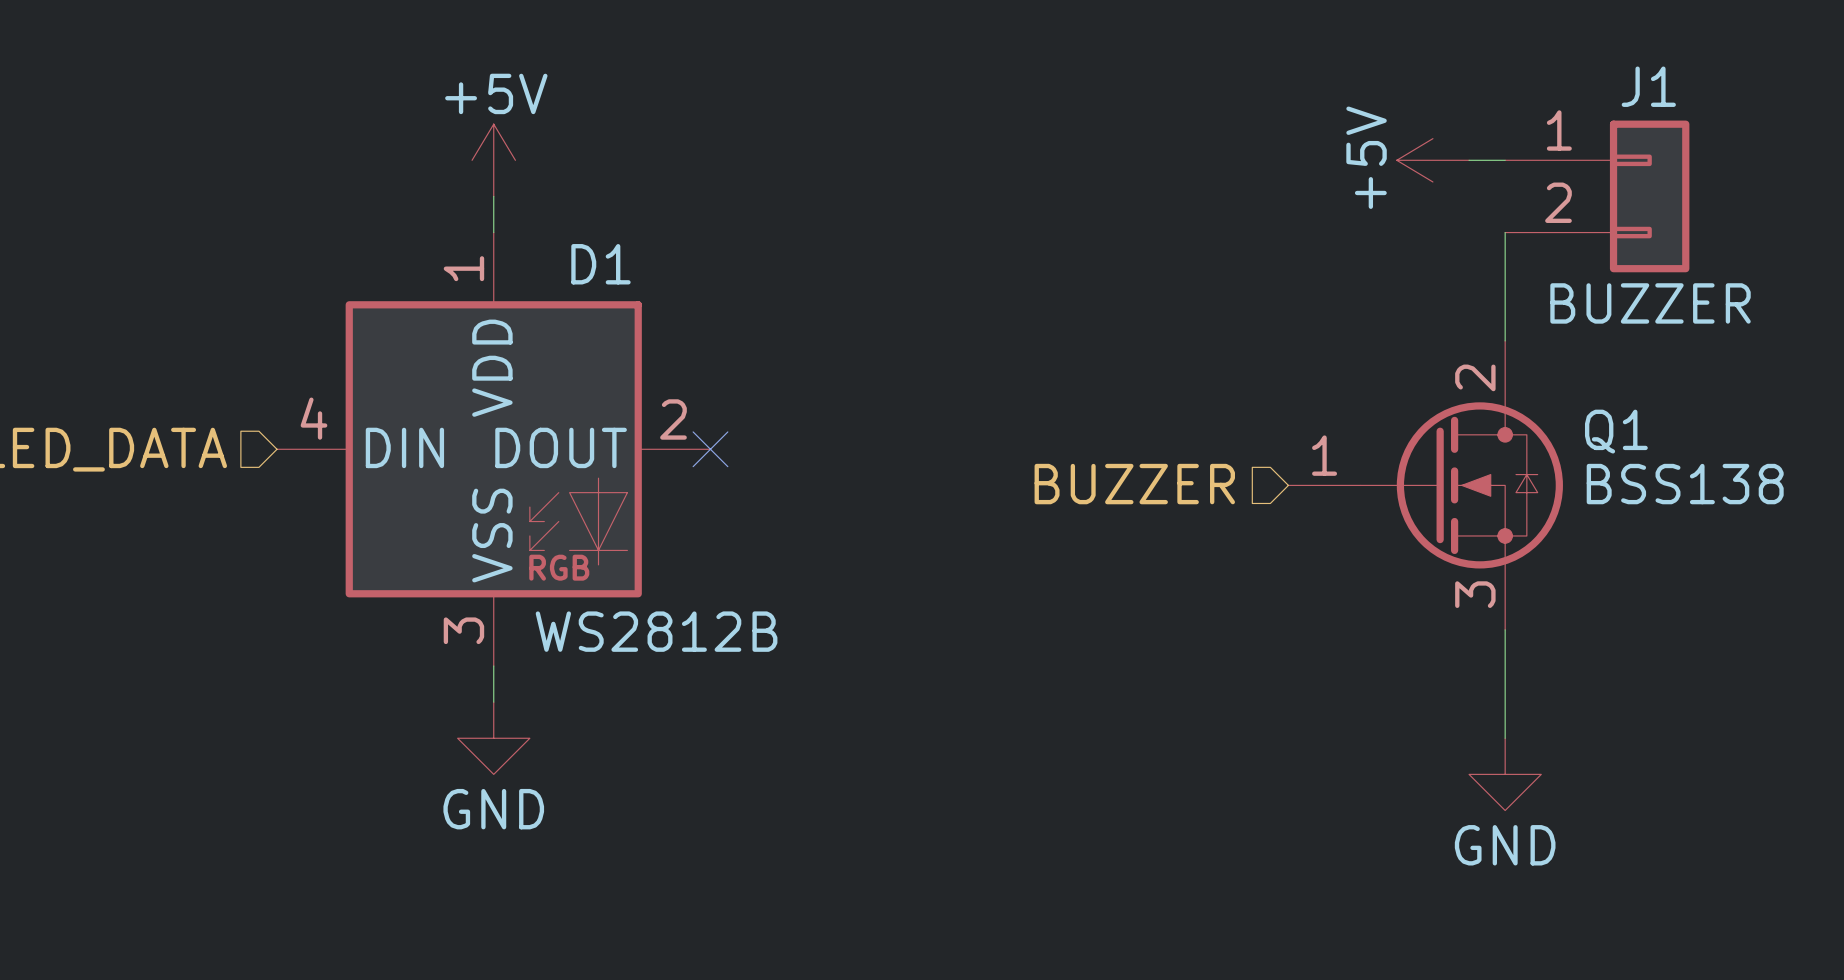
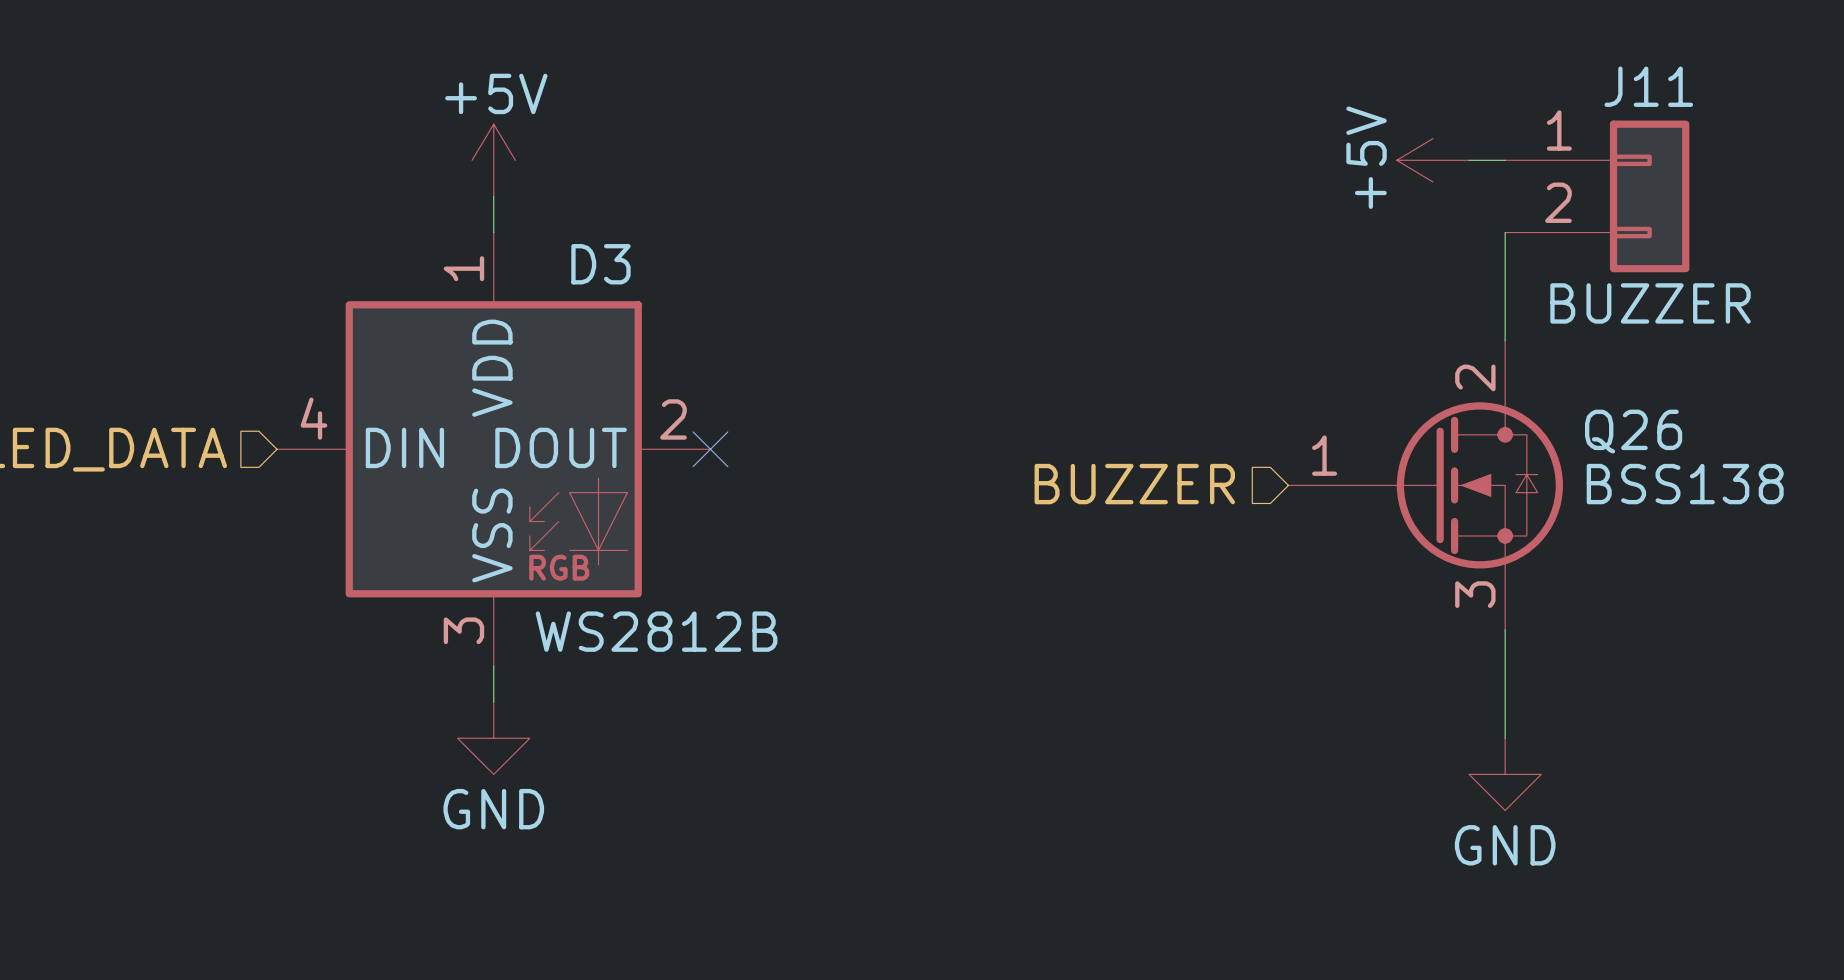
J1 name: J1 (1648, 86) -> J11 (1648, 86)
D1 name: D1 (600, 264) -> D3 (600, 264)
Q1 name: Q1 (1616, 431) -> Q26 (1633, 431)

